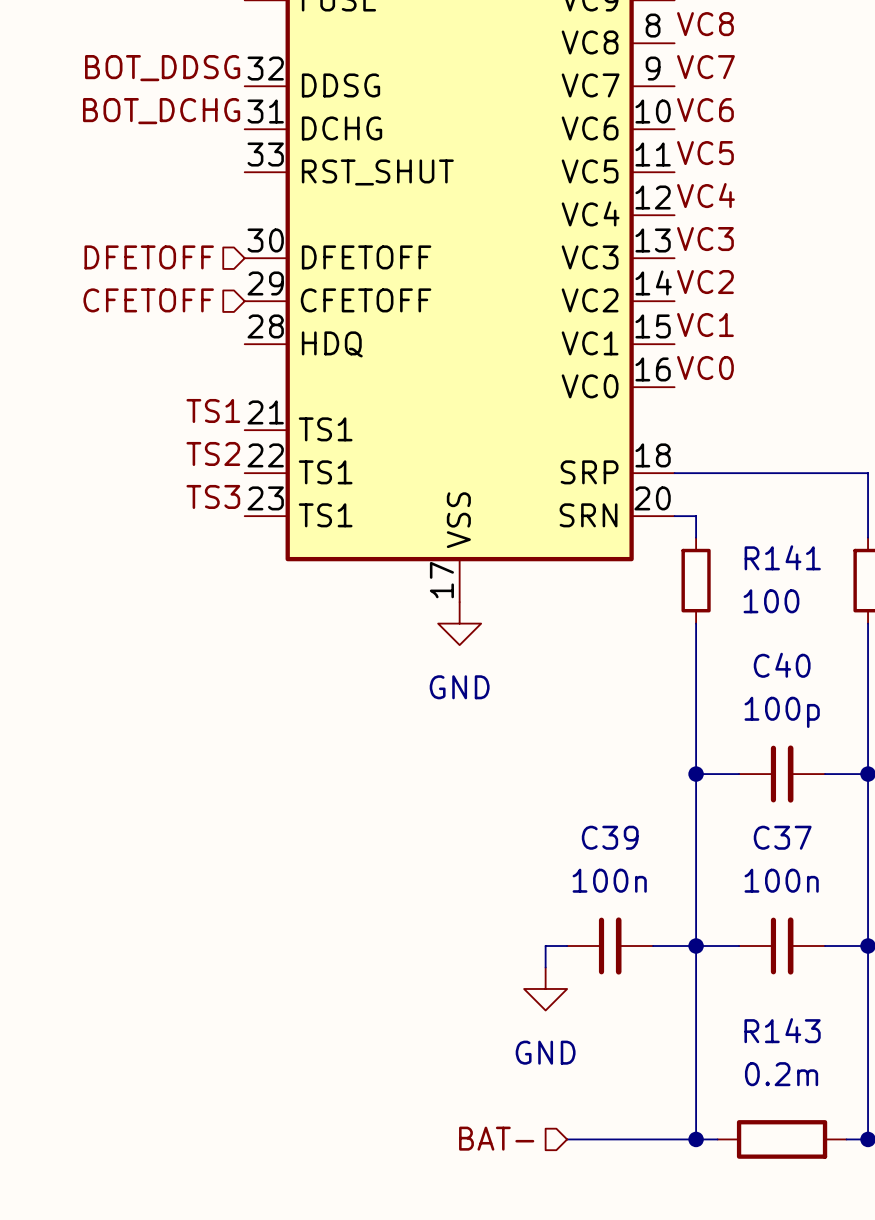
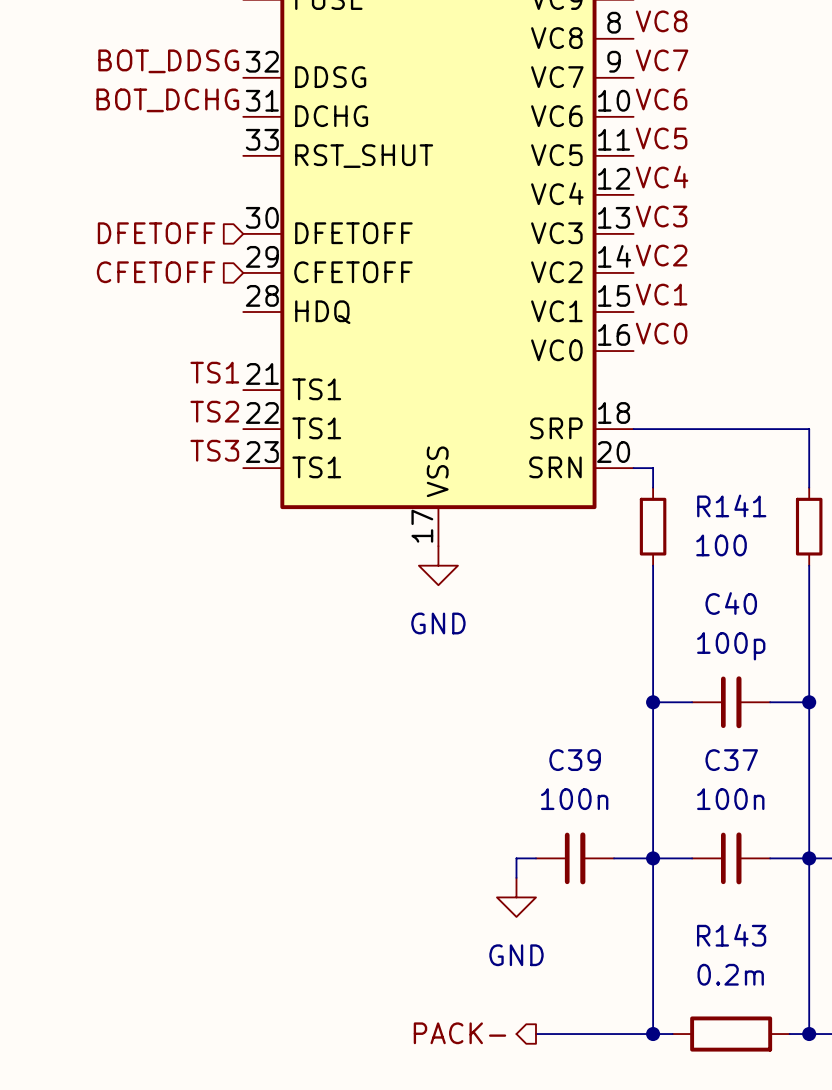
hierarchical label shape: input (496, 1138) -> output (459, 1033)
hierarchical label: BAT- (496, 1138) -> PACK- (459, 1033)

